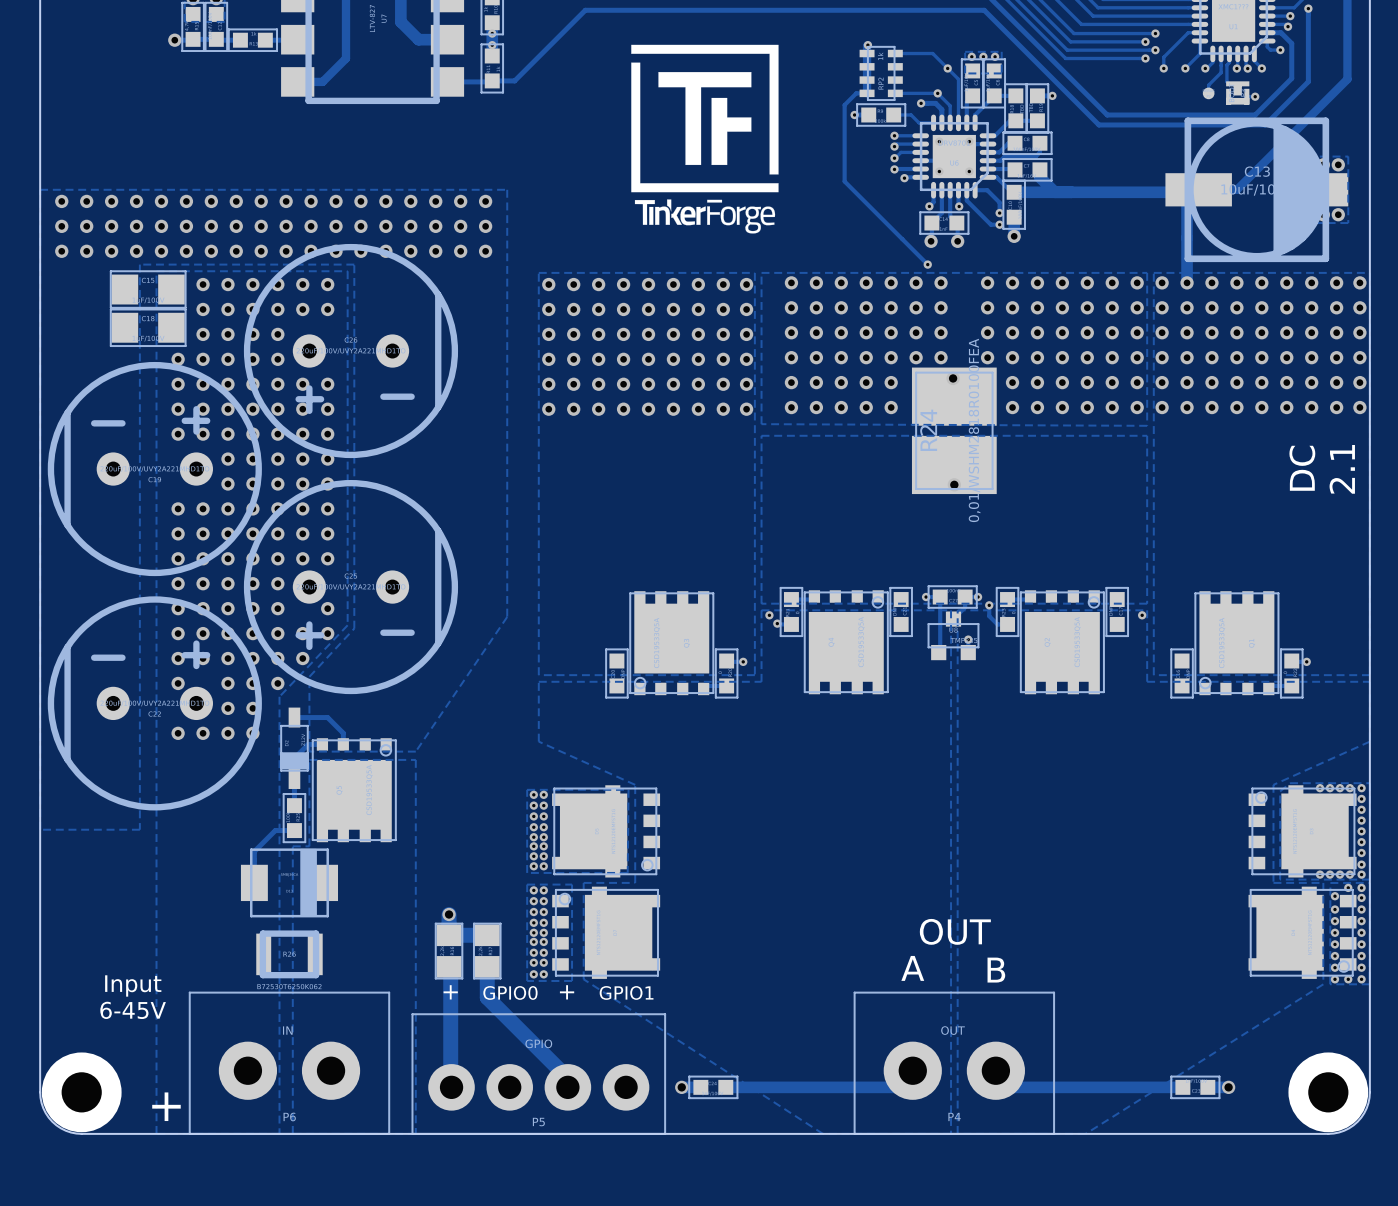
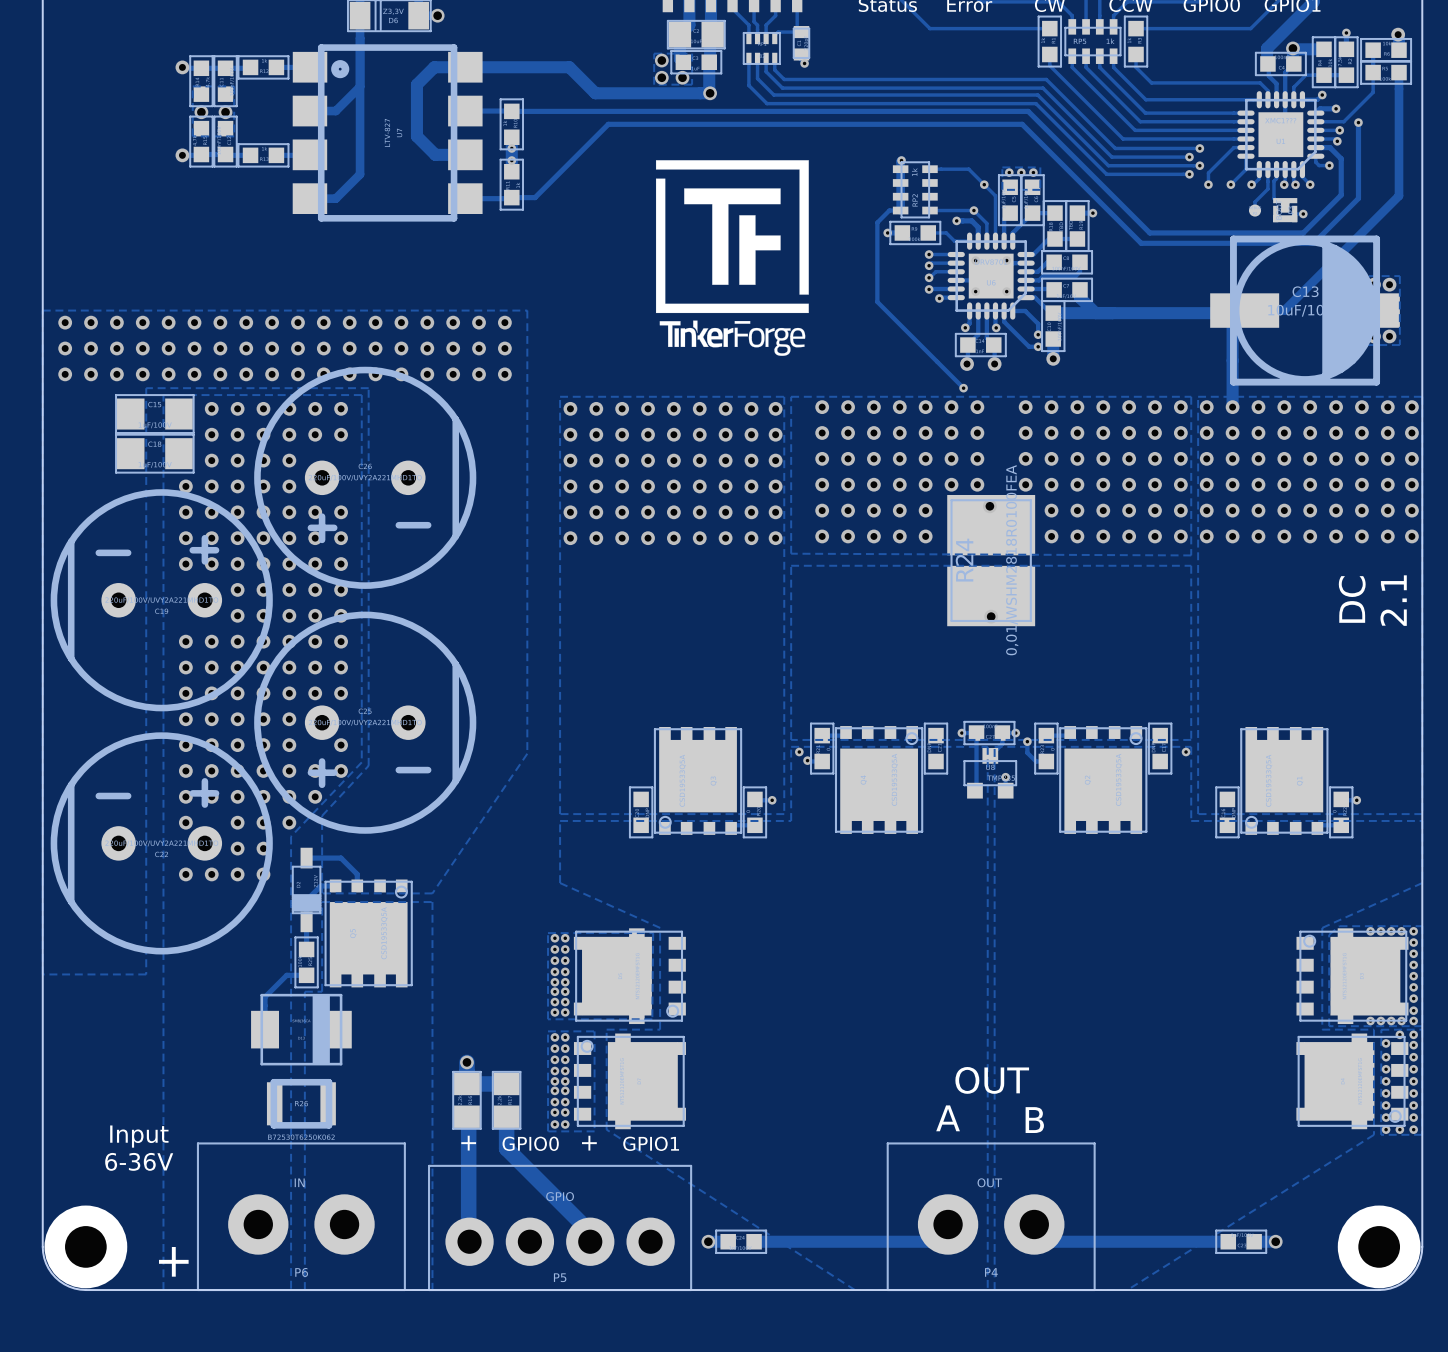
text: 6-45V (133, 1010) -> 6-36V (139, 1161)

